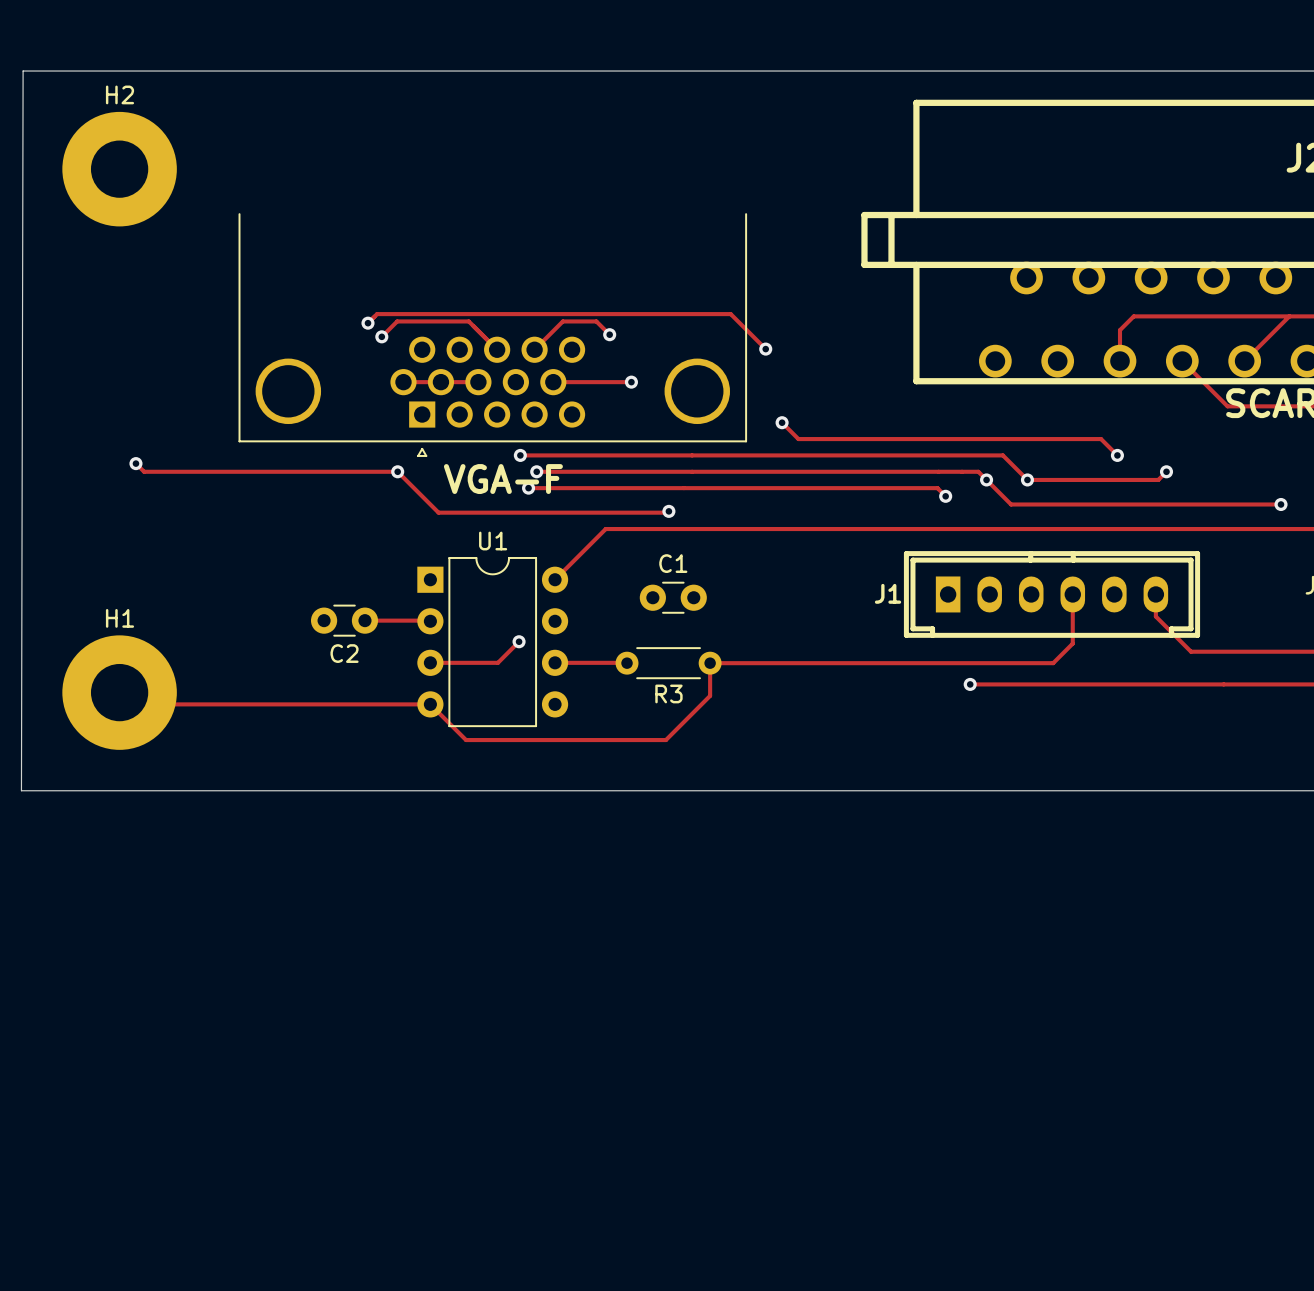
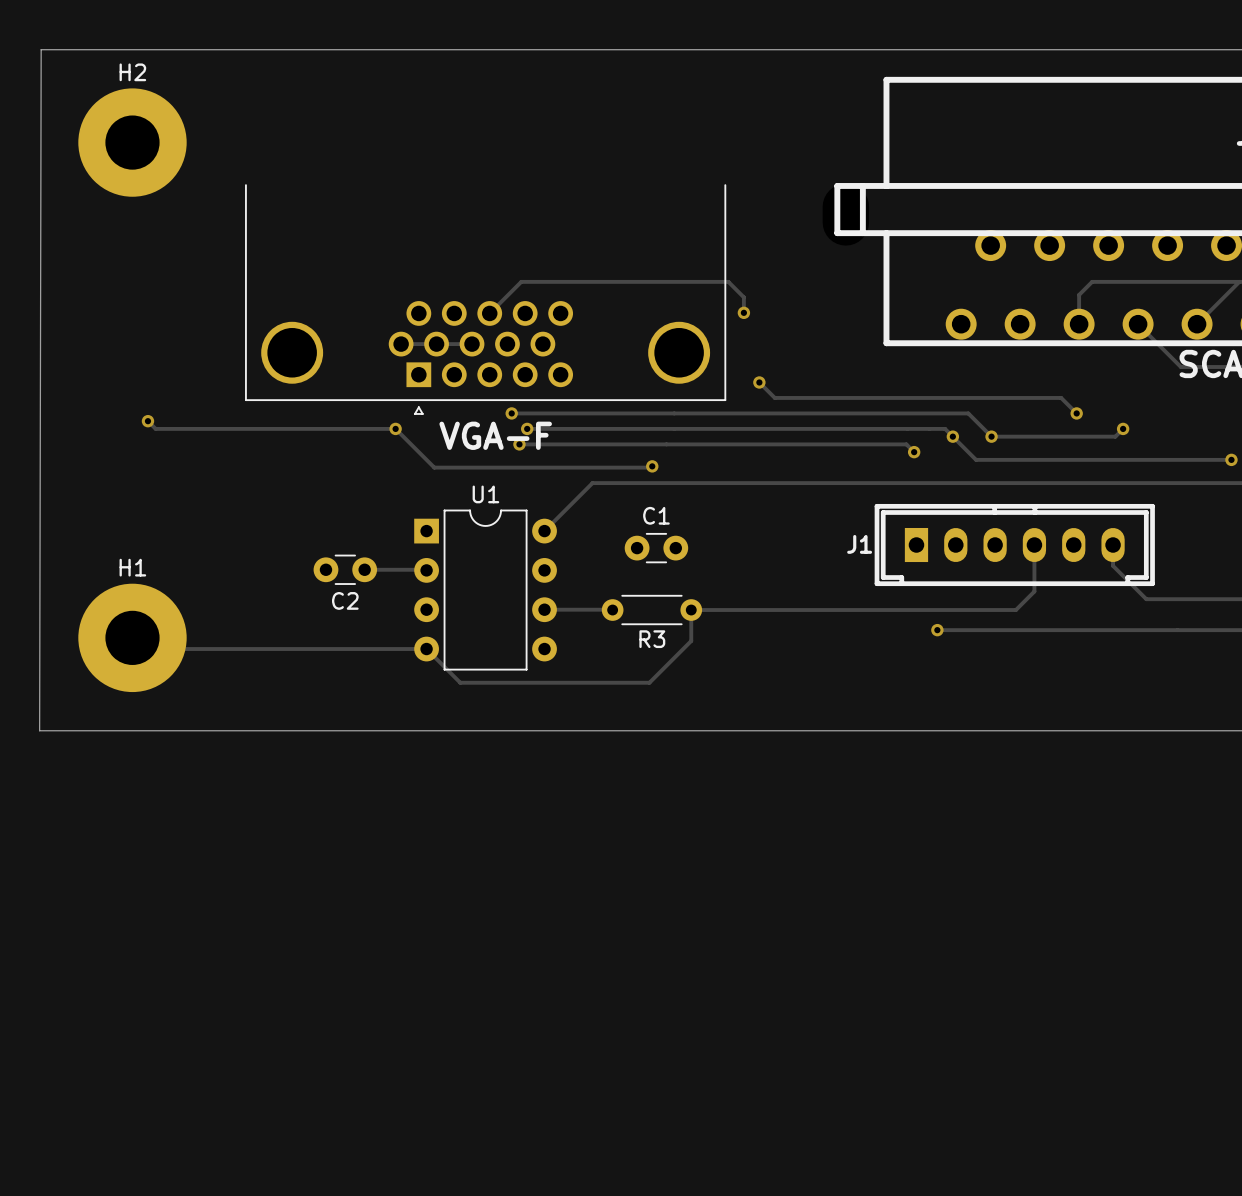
track: (367, 323) (377, 314) (730, 314) (765, 349) -> (489, 313) (521, 281) (728, 281) (743, 297) (743, 312)
via: (367, 323) -> none
track: (609, 334) (596, 321) (562, 321) (534, 349) -> none
via: (609, 334) -> none
track: (381, 336) (397, 321) (468, 321) (497, 349) -> none
via: (381, 336) -> none
track: (553, 382) (631, 382) -> none
via: (631, 382) -> none
track: (519, 641) (497, 662) (430, 662) -> none
via: (519, 641) -> none

